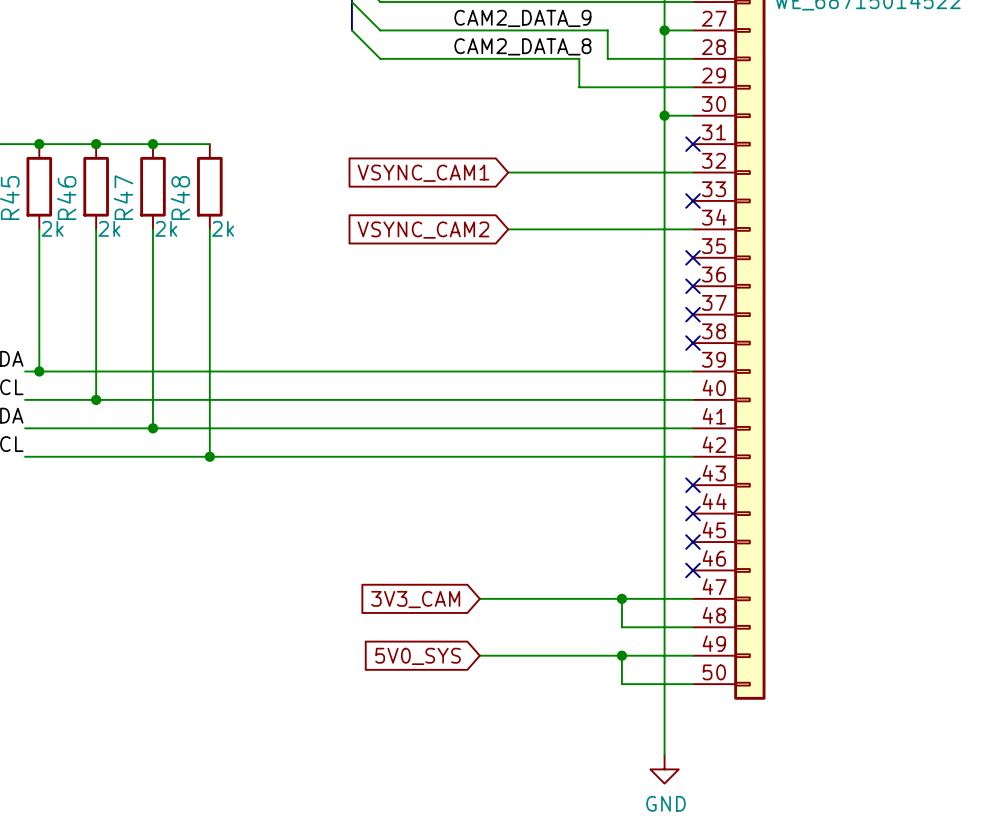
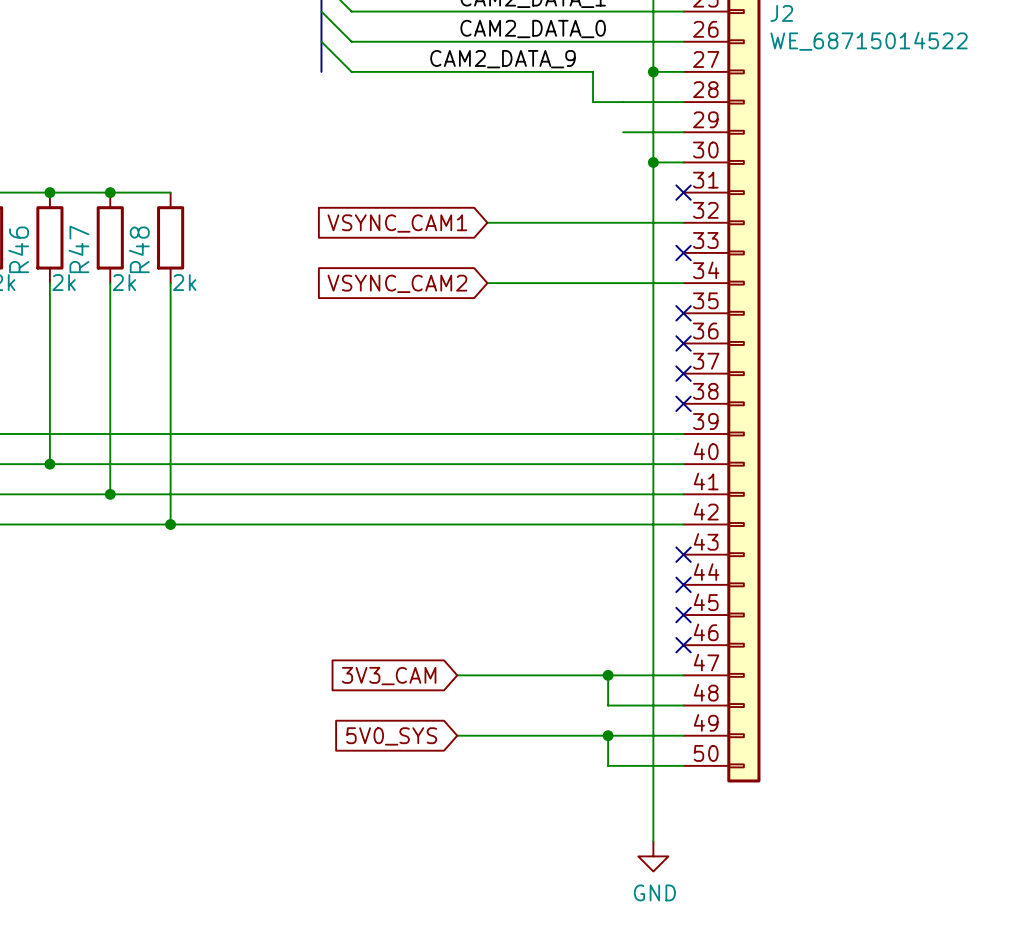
wire: (351, 30) (380, 58) (579, 58) (579, 87) (636, 87) -> none
label: CAM2_DATA_8 (522, 46) -> none

